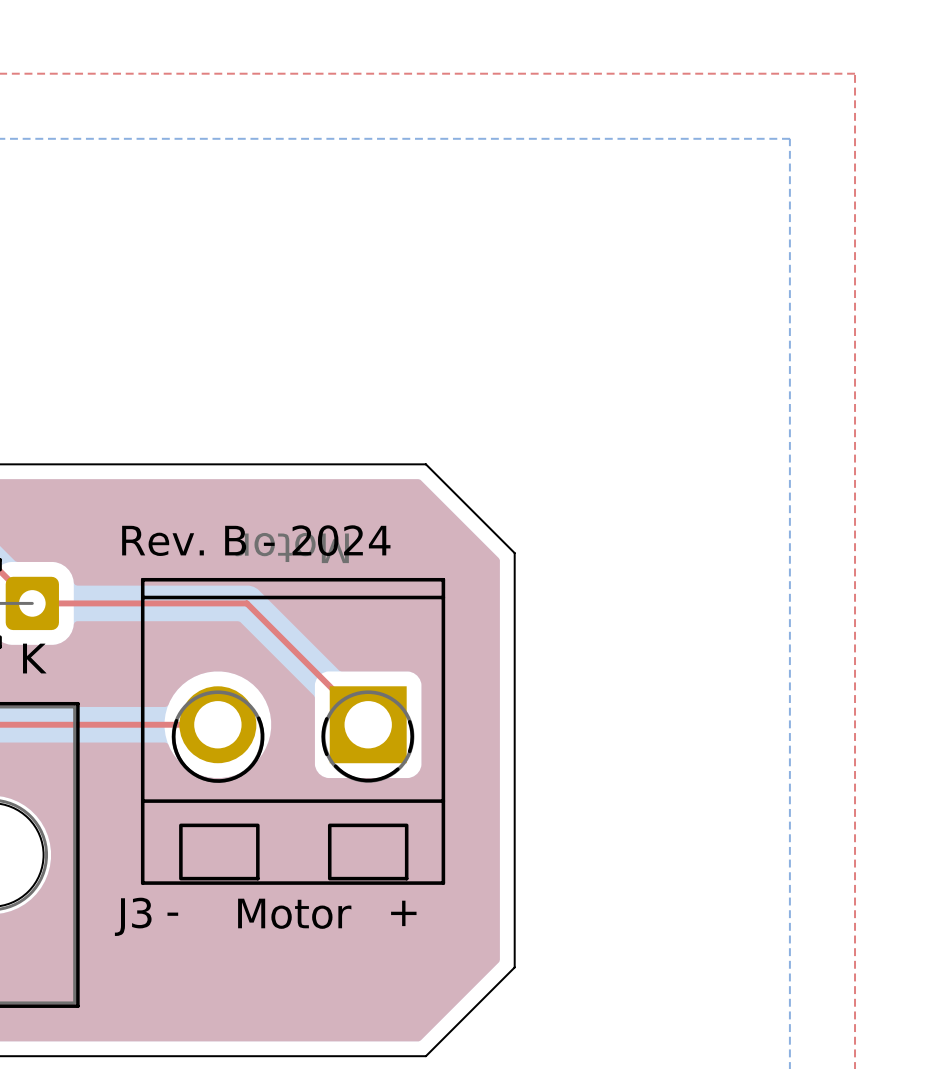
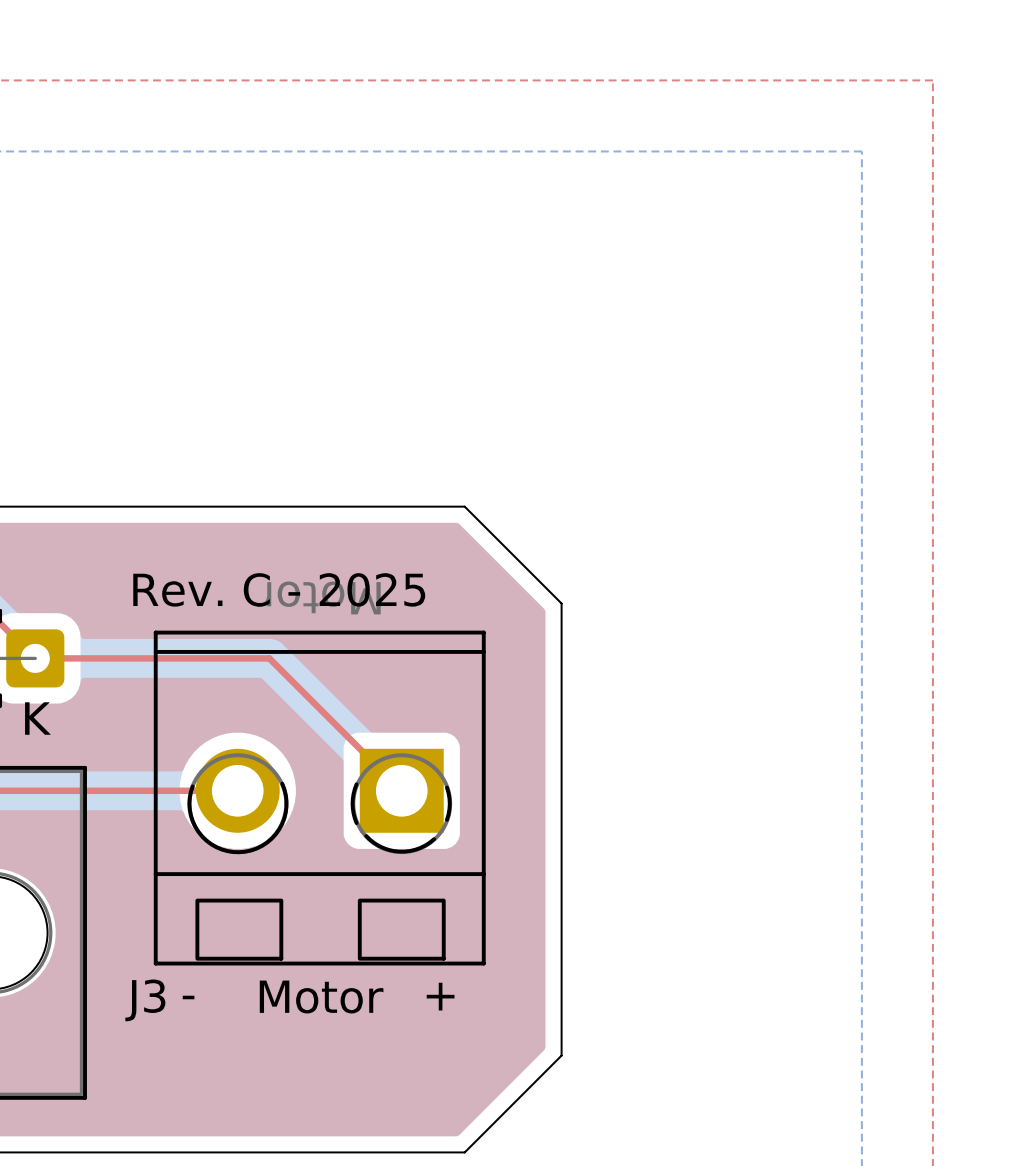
text: Rev. B - 2024 (256, 540) -> Rev. C - 2025 (279, 589)

